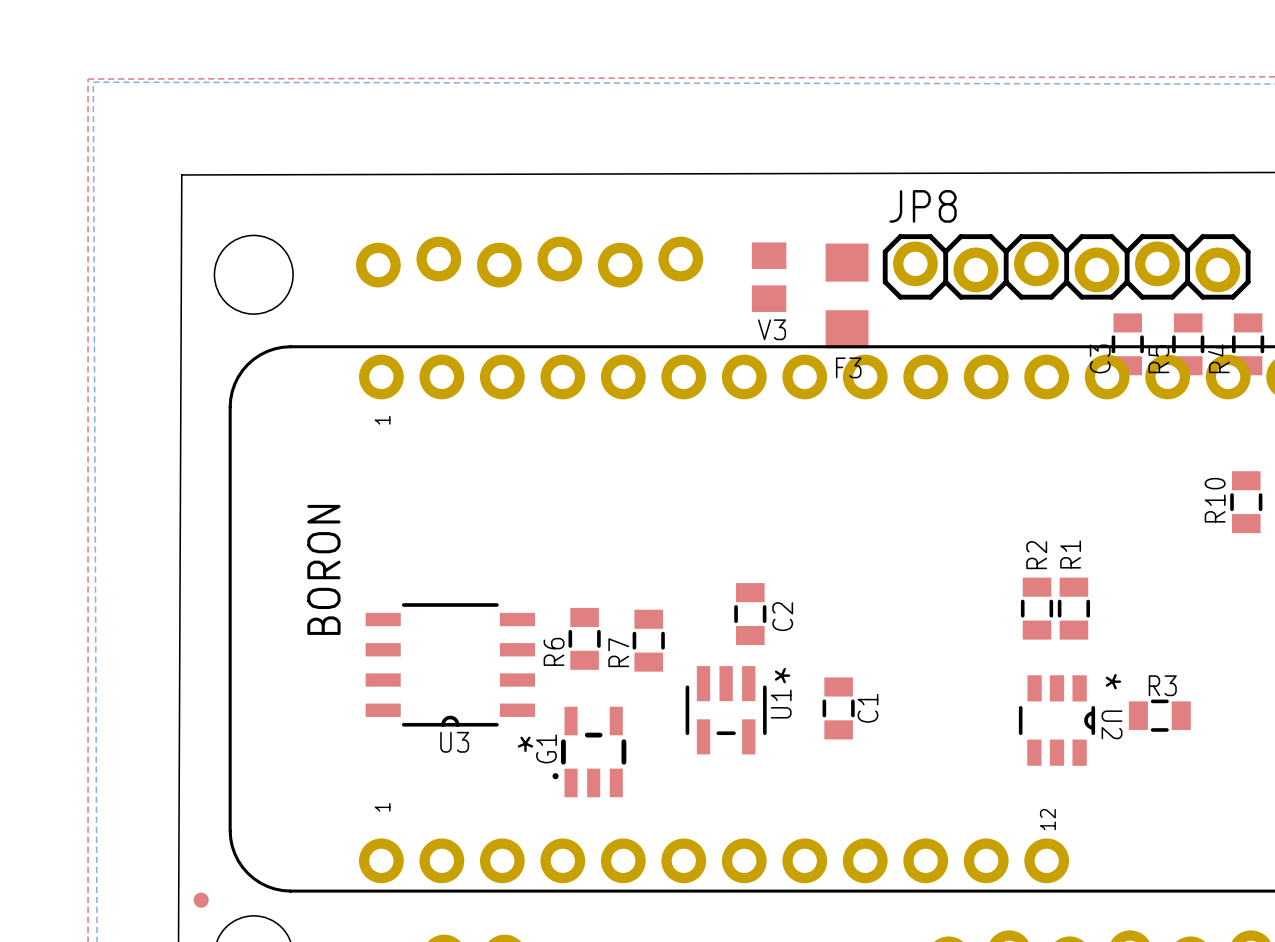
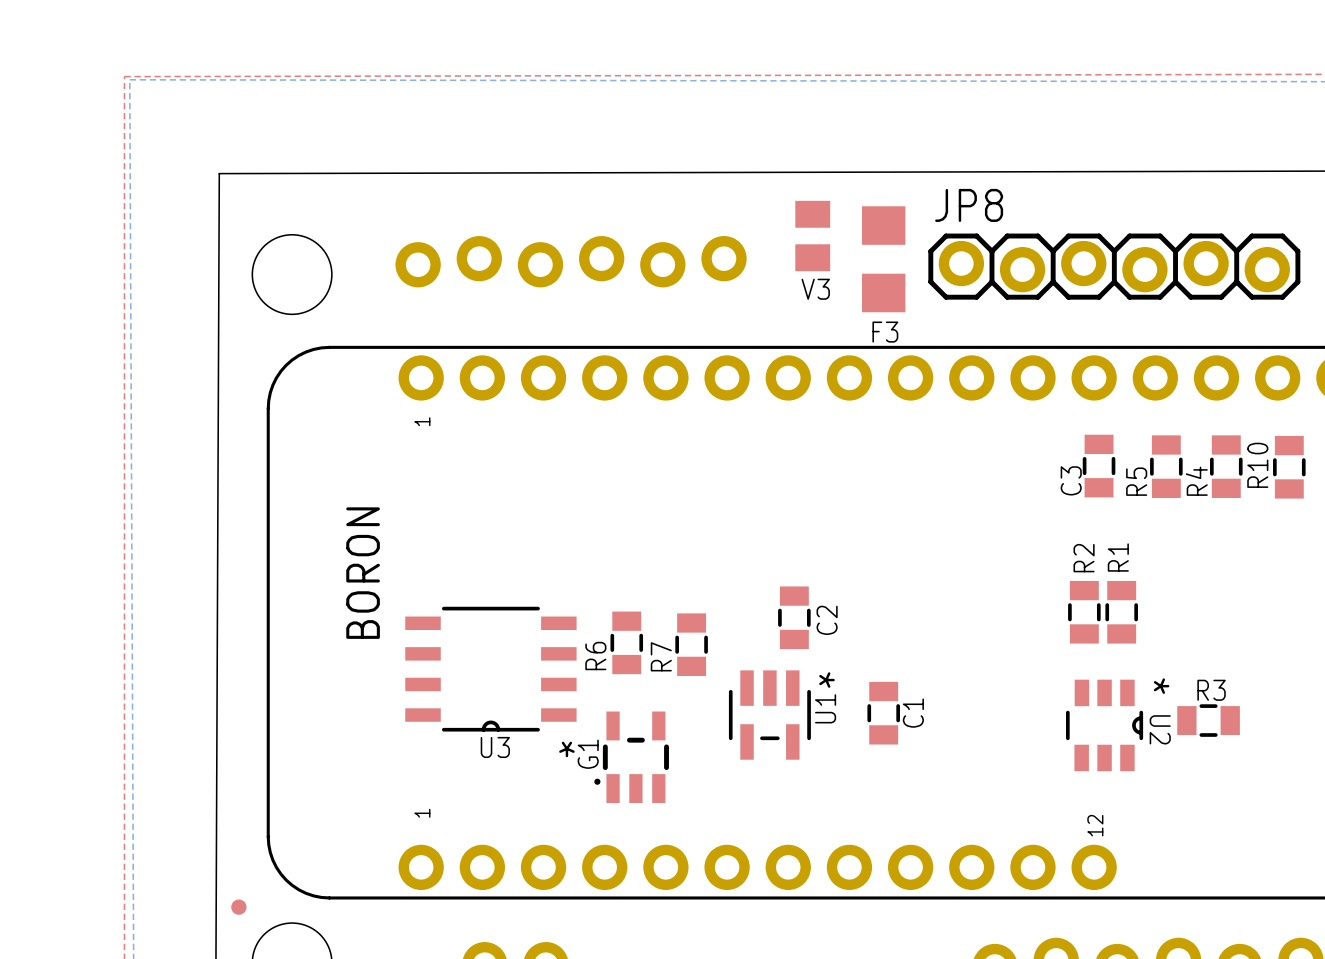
V3 position: (769, 277) -> (812, 236)
F3 position: (847, 295) -> (883, 259)
C3 position: (1127, 344) -> (1099, 466)
R5 position: (1188, 344) -> (1166, 466)
R4 position: (1248, 344) -> (1226, 466)
R10 position: (1246, 502) -> (1289, 467)

